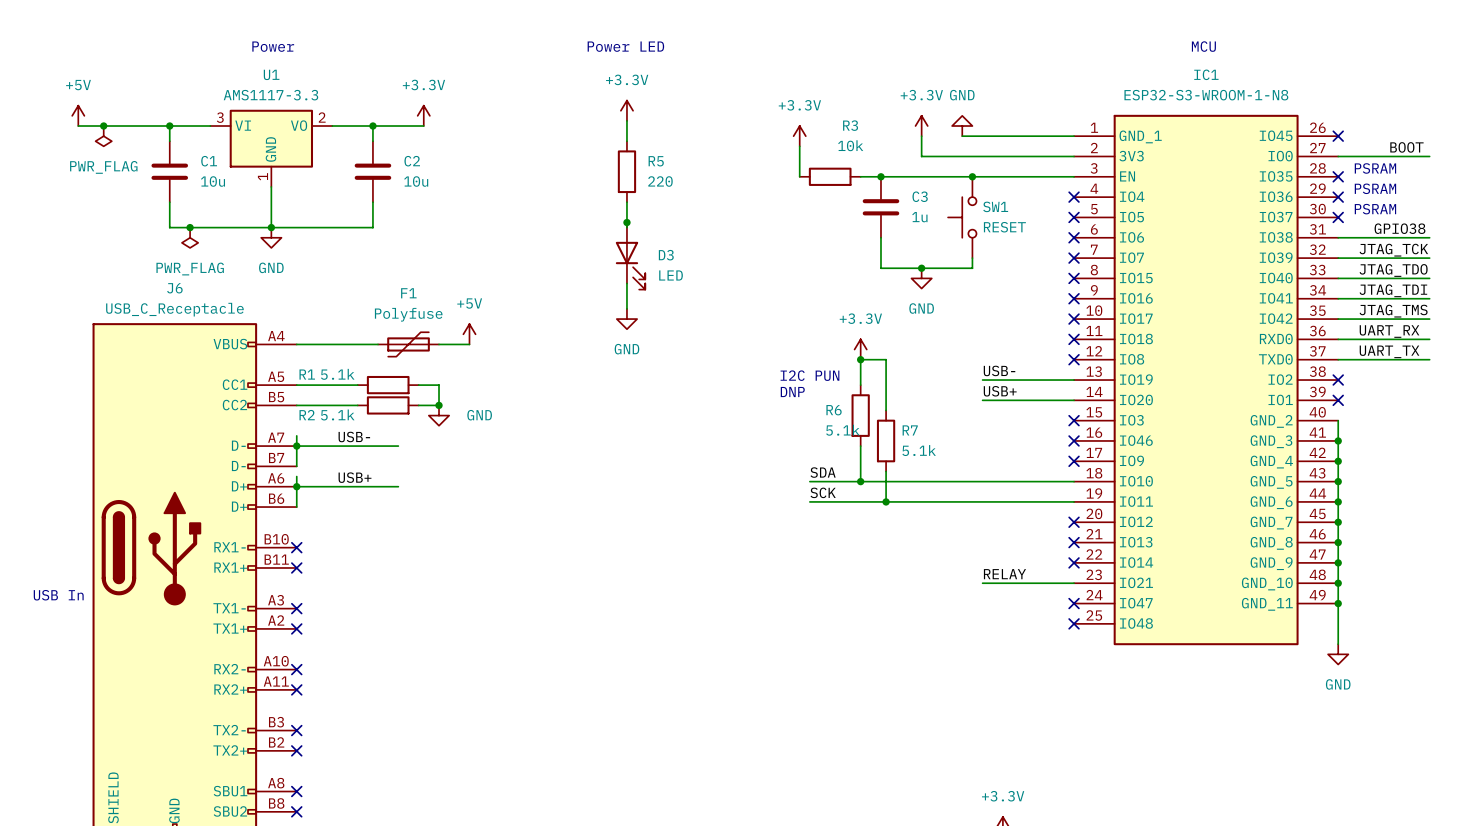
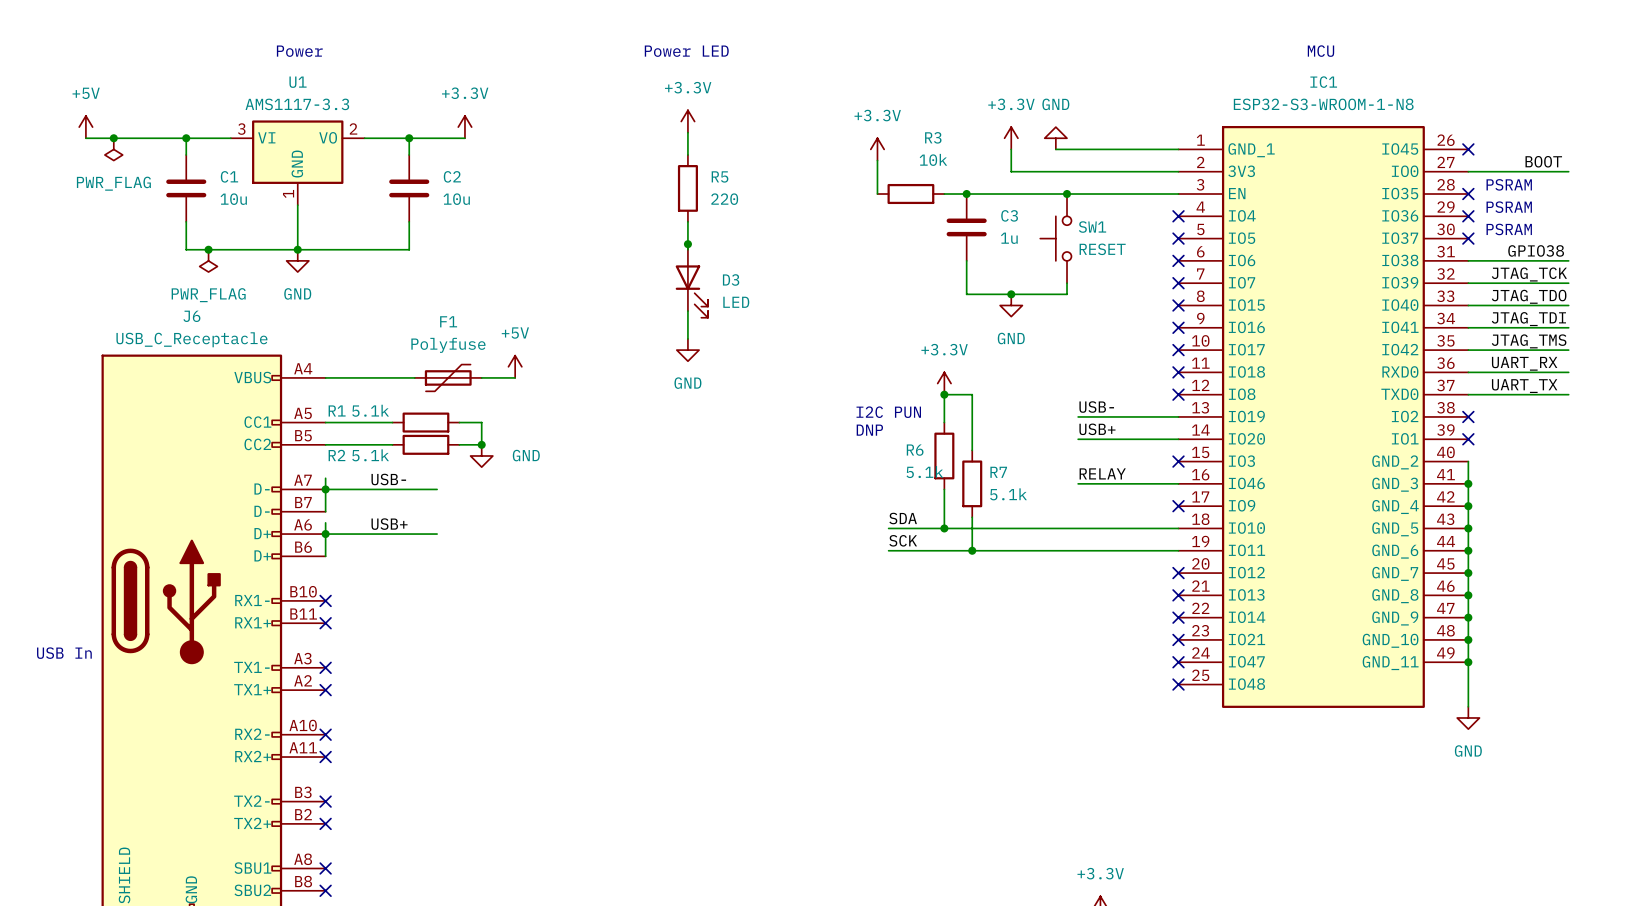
no-connect mark: (1074, 440) -> none
label position: RELAY (1004, 574) -> RELAY (1102, 473)
wire: (982, 583) (1074, 583) -> (1078, 483) (1178, 483)
no-connect mark: none -> (1178, 639)

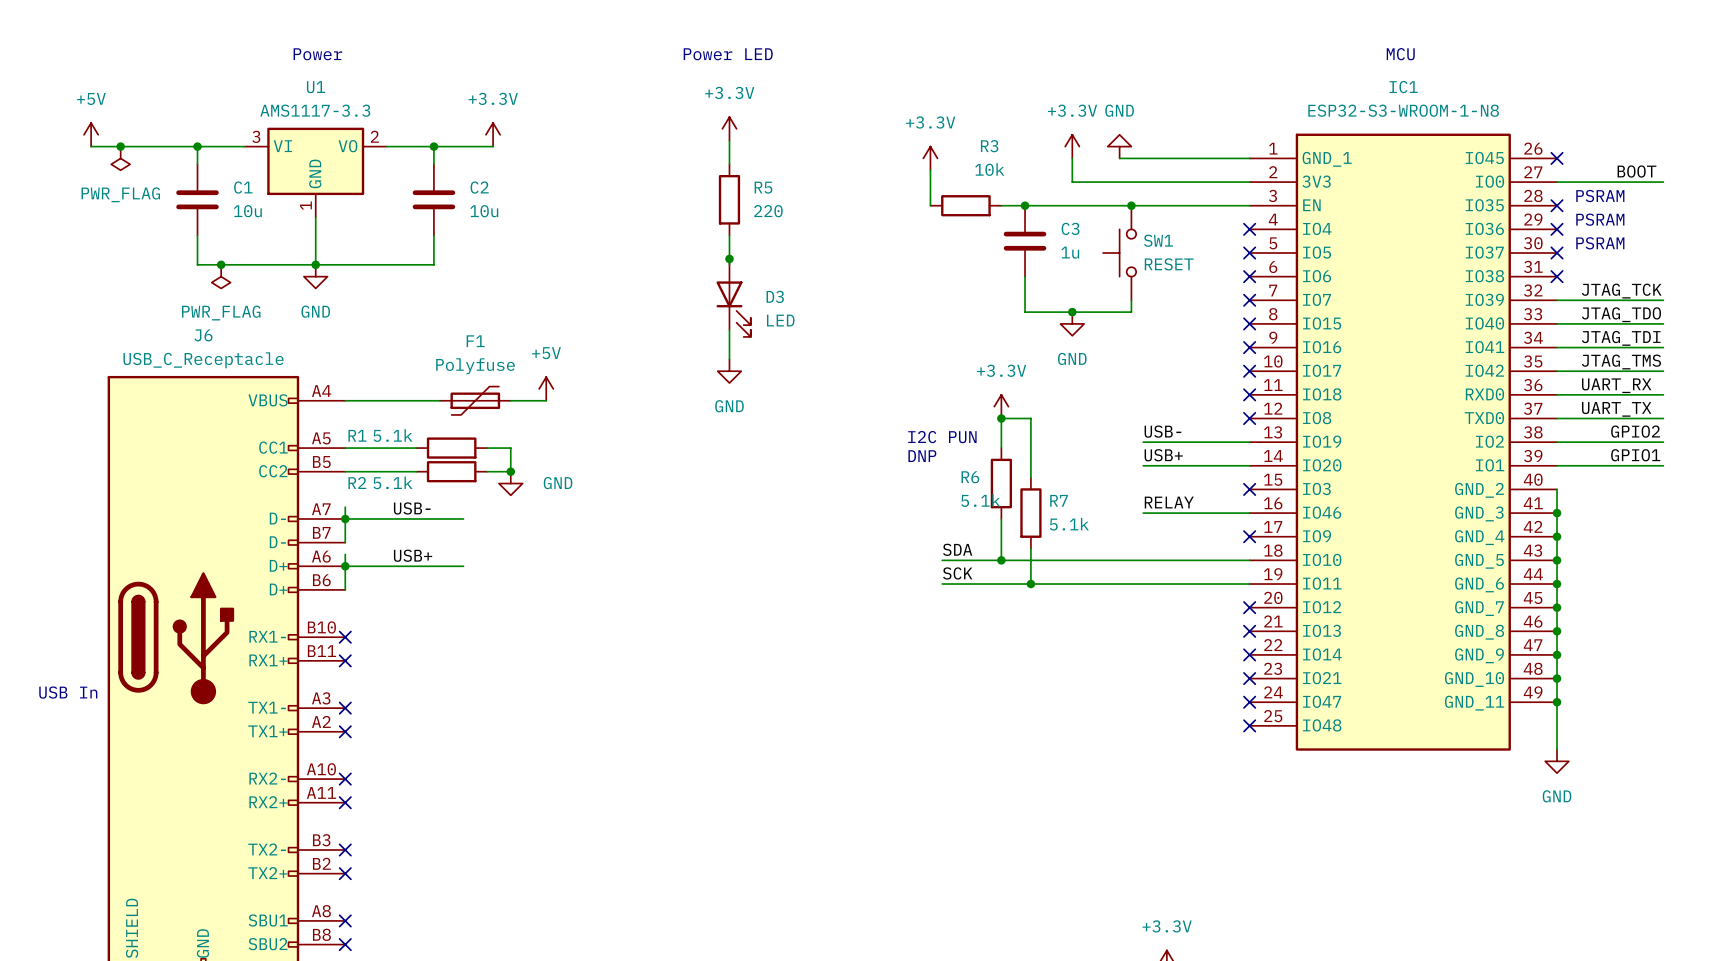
label: GPIO38 (1536, 250) -> none
wire: (1468, 260) (1568, 260) -> (1557, 442) (1663, 442)
no-connect mark: none -> (1557, 276)
label: none -> GPIO2 (1635, 431)
no-connect mark: (1468, 416) -> none
label: none -> GPIO1 (1635, 455)
wire: none -> (1557, 465) (1663, 465)
no-connect mark: (1468, 439) -> none

